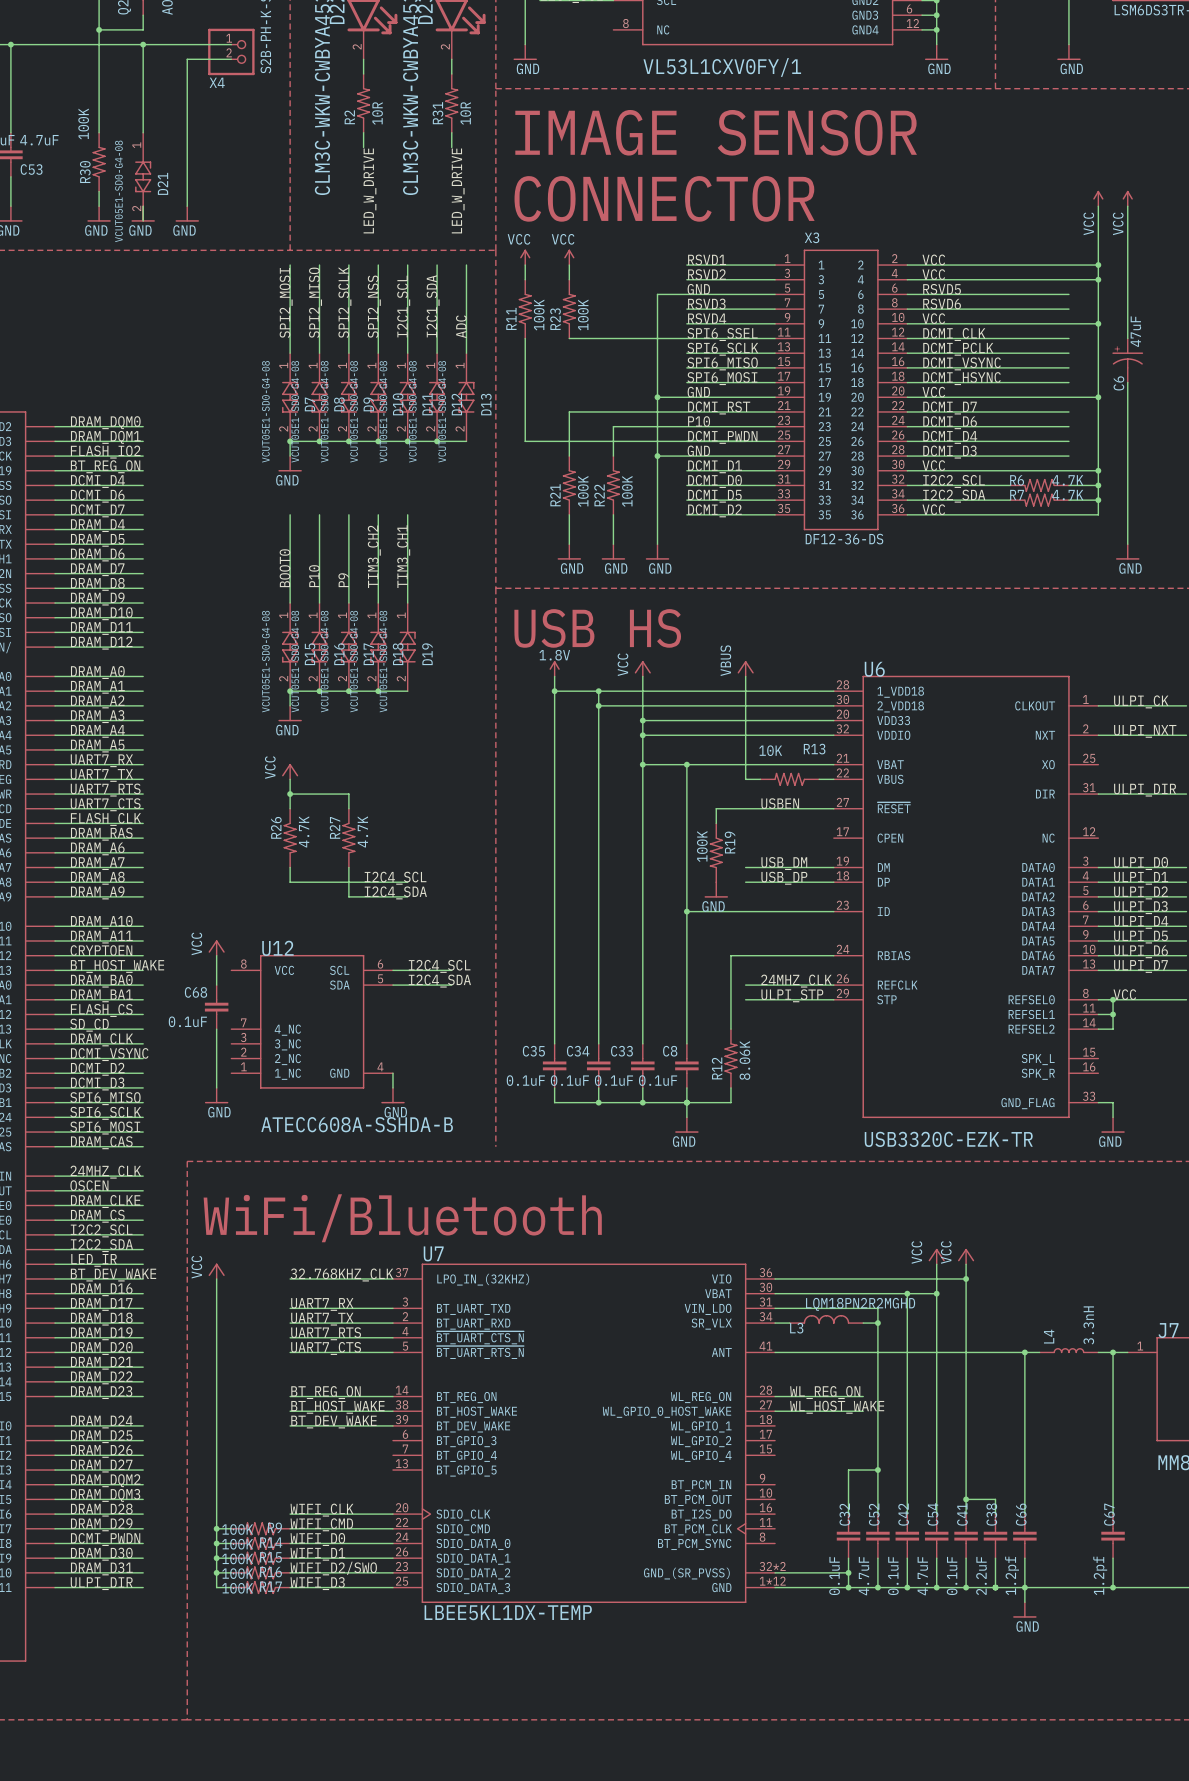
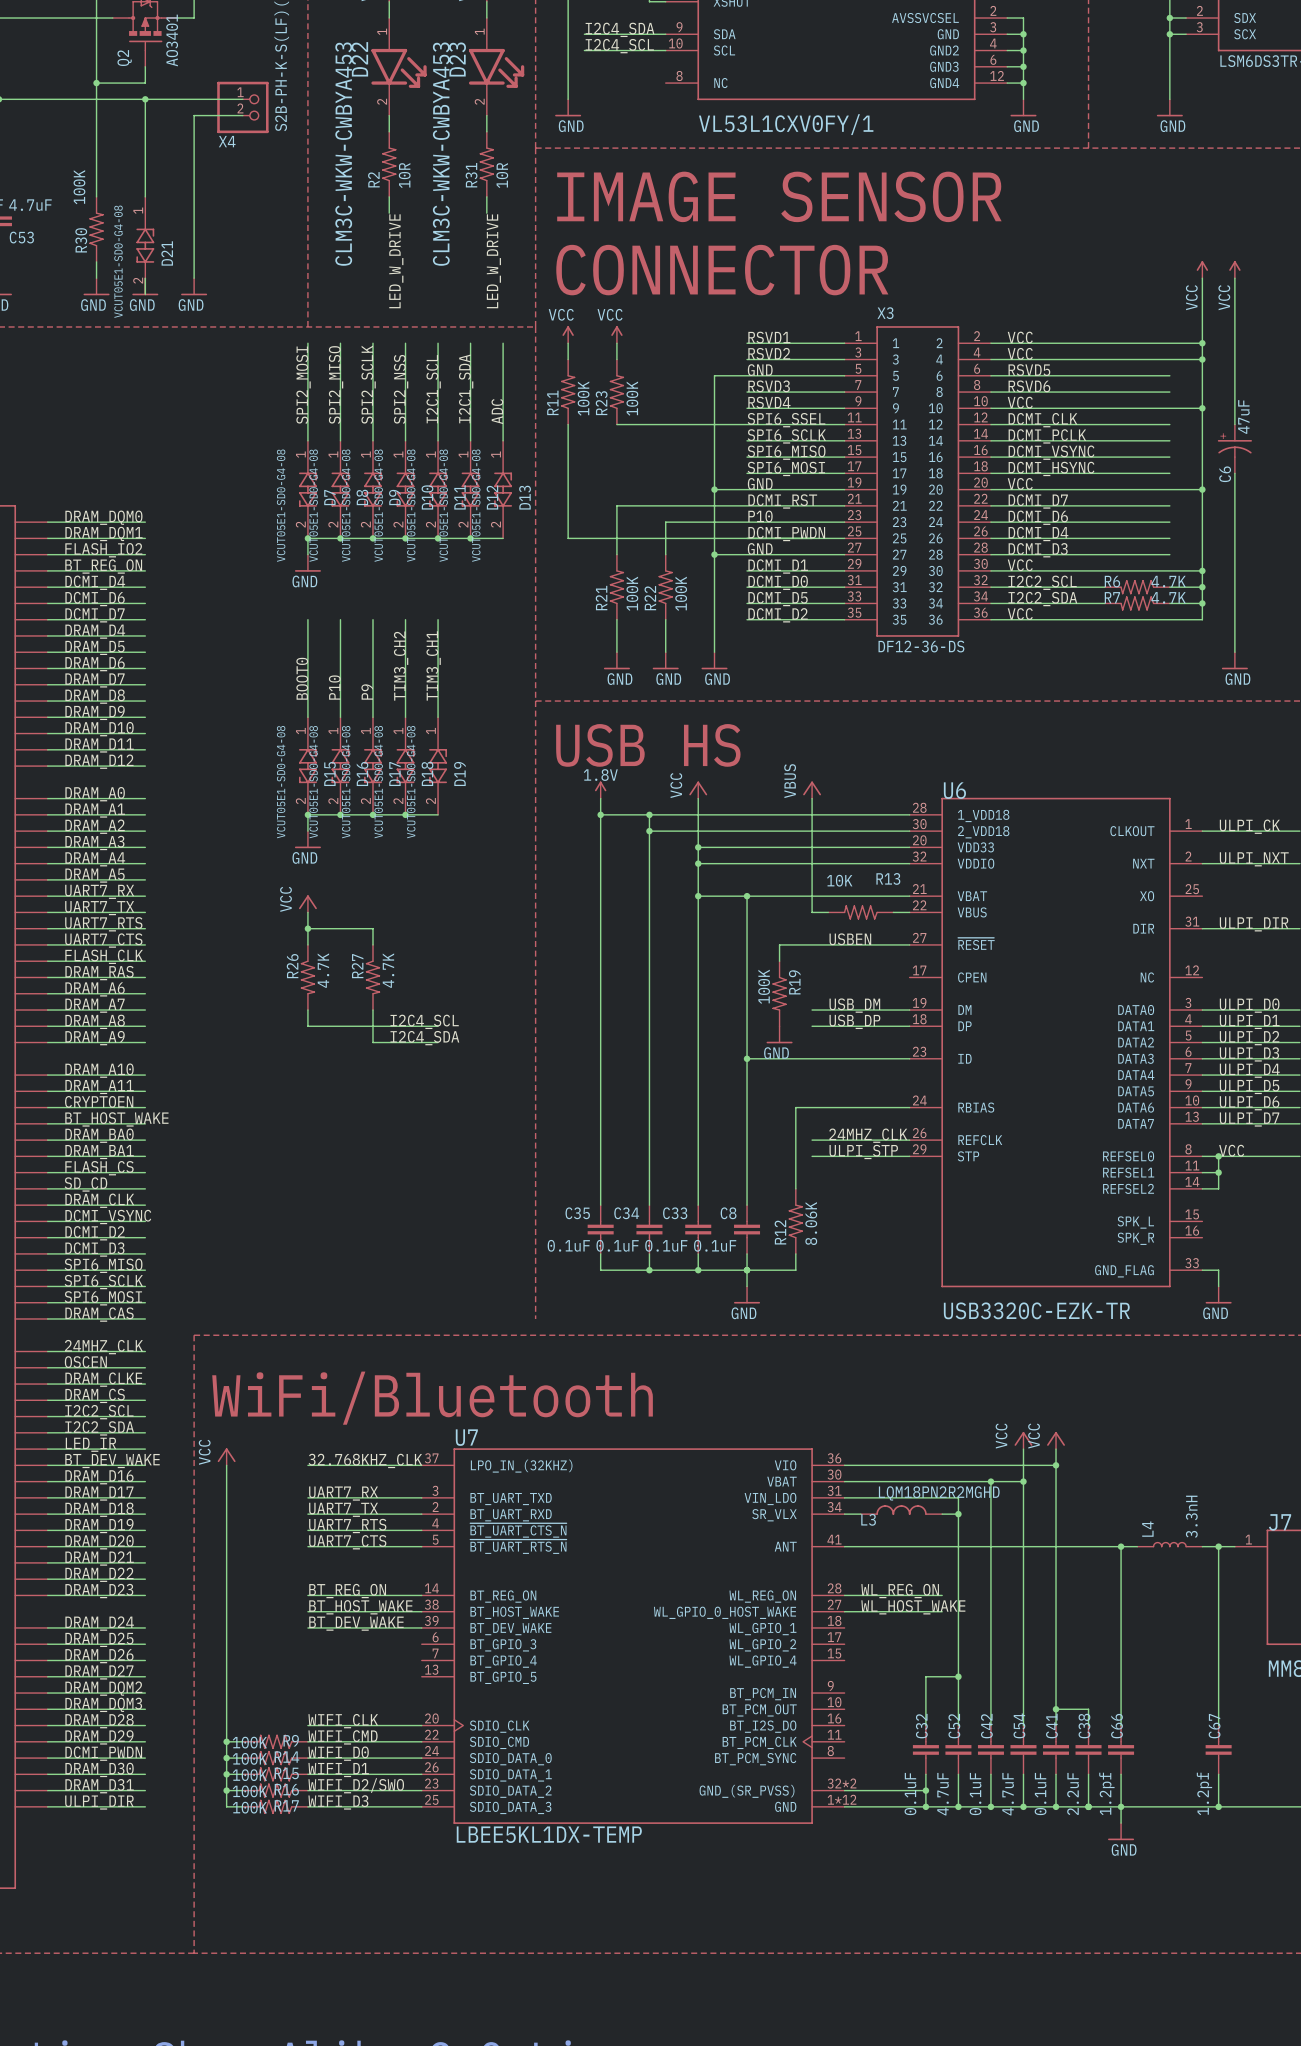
power symbol: VCC (216, 947) -> none
wire: (216, 955) (216, 985) -> none
label: I2C4_SCL (439, 966) -> none
wire: (392, 970) (451, 970) -> none
label: I2C4_SDA (439, 981) -> none
wire: (392, 985) (451, 985) -> none
C68: 0.1uF (216, 1007) -> none
U12: (312, 1021) -> none
wire: (216, 1029) (216, 1087) -> none
wire: (392, 1073) (392, 1087) -> none
power symbol: GND (216, 1095) -> none
power symbol: GND (392, 1095) -> none

